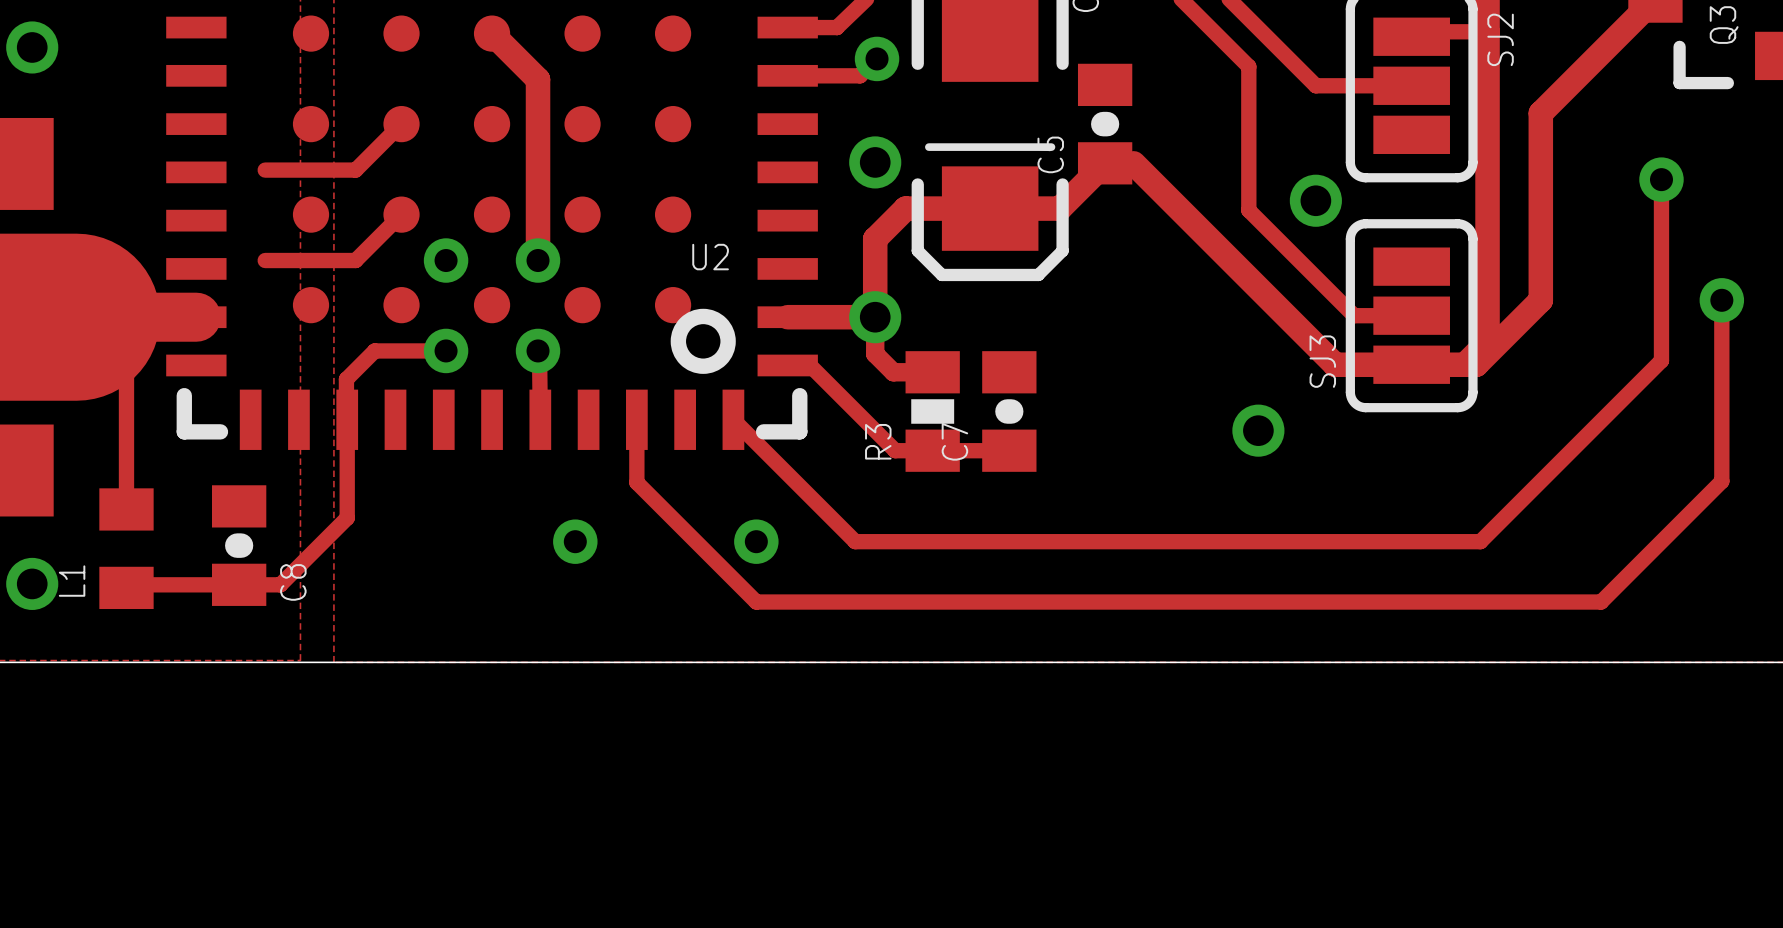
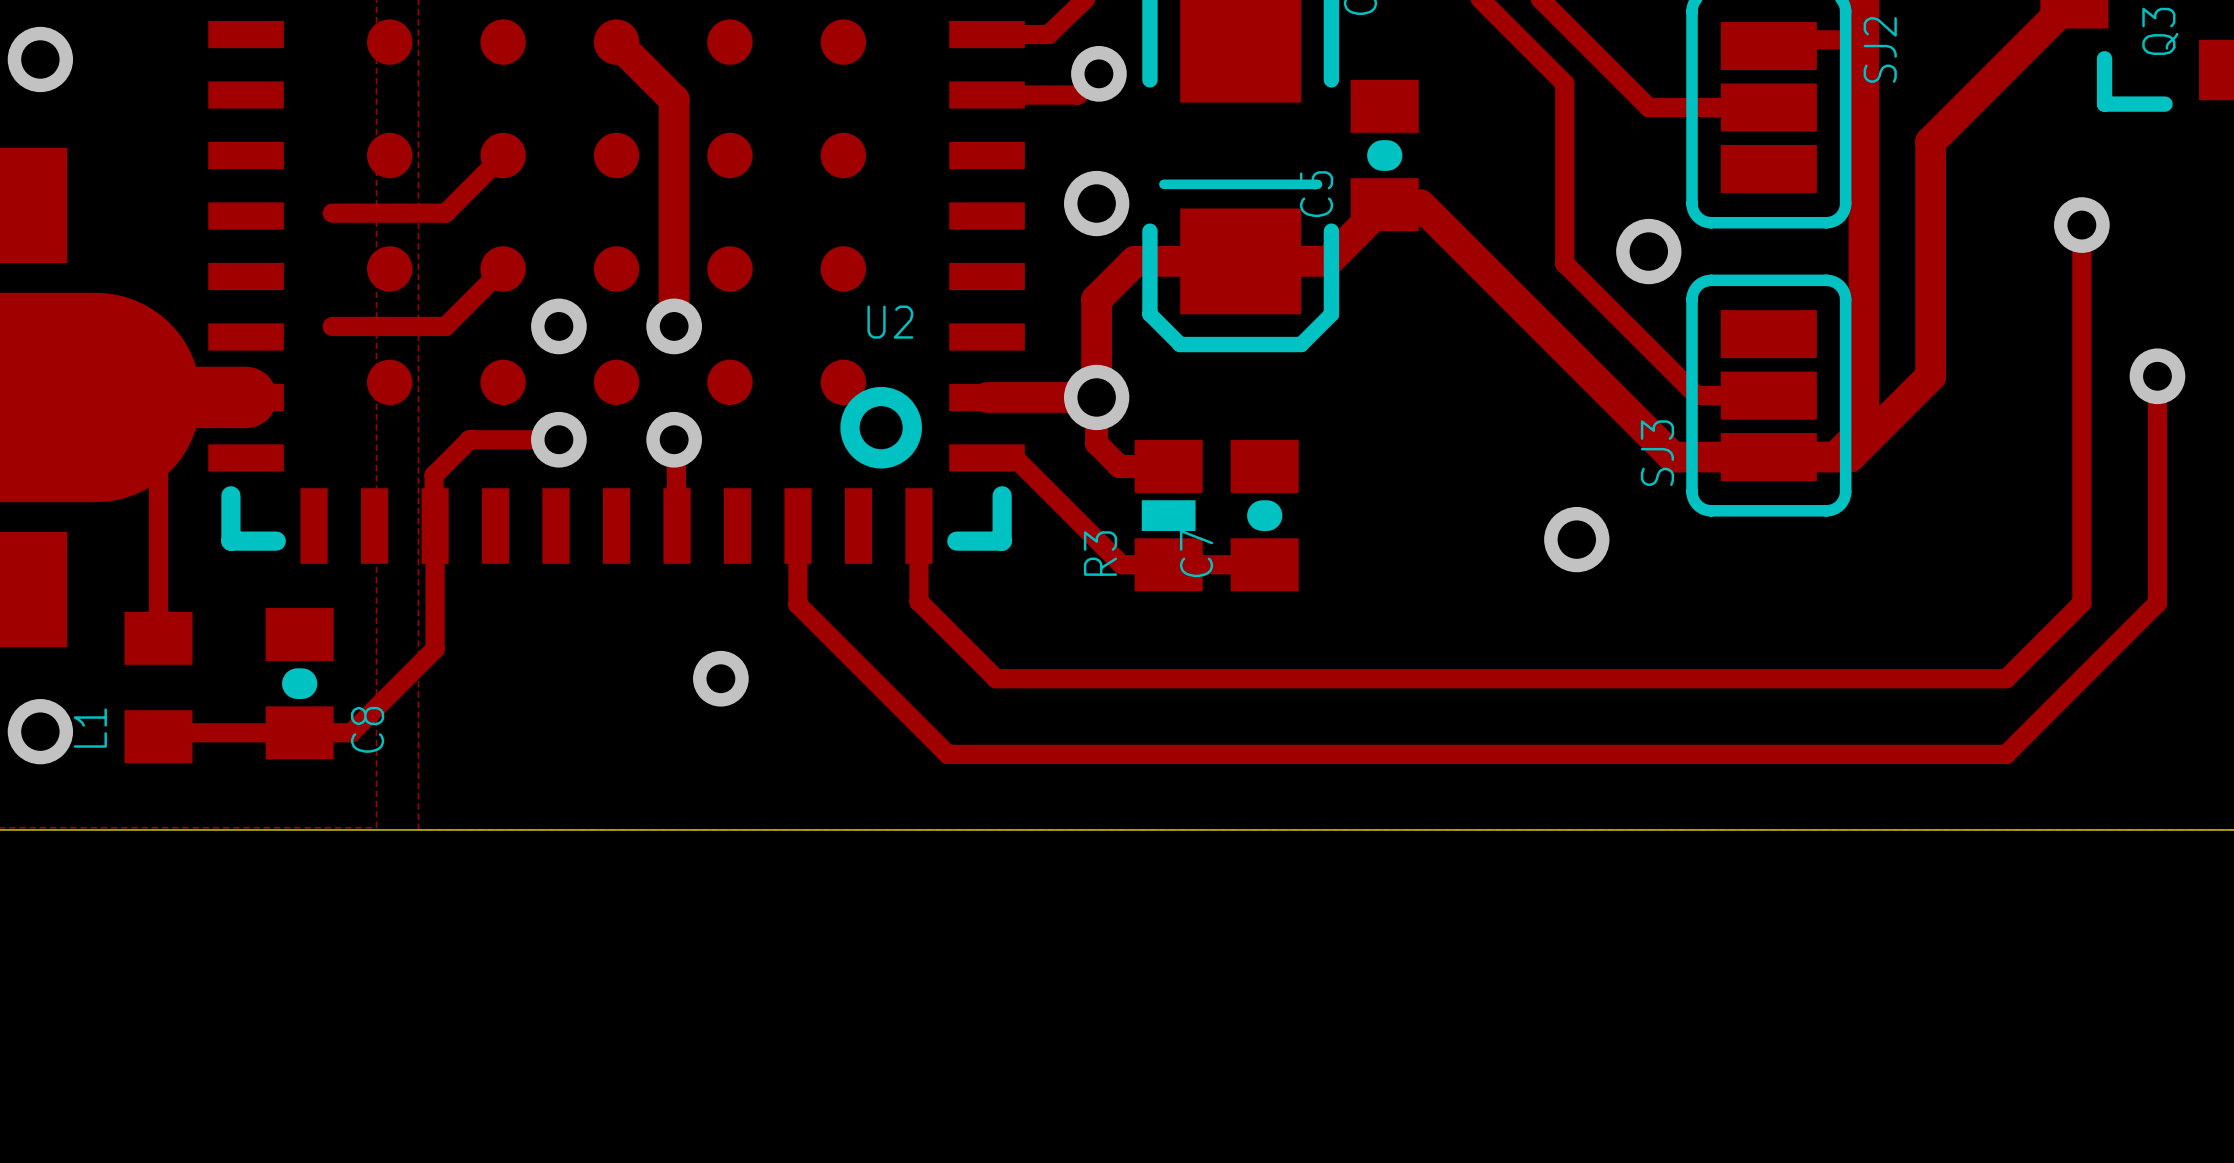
track: (1661, 360) (1480, 541) -> (2081, 451) (2081, 603) (2006, 678) (1855, 678)
track: (733, 419) (855, 541) -> (918, 526) (918, 601) (996, 678) (1071, 678)
via: (756, 541) -> none

